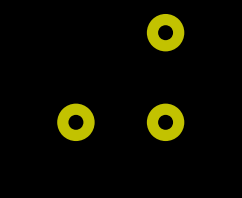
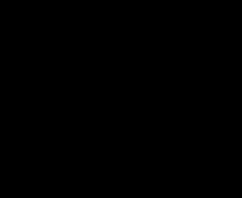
part: (120, 77) -> none

